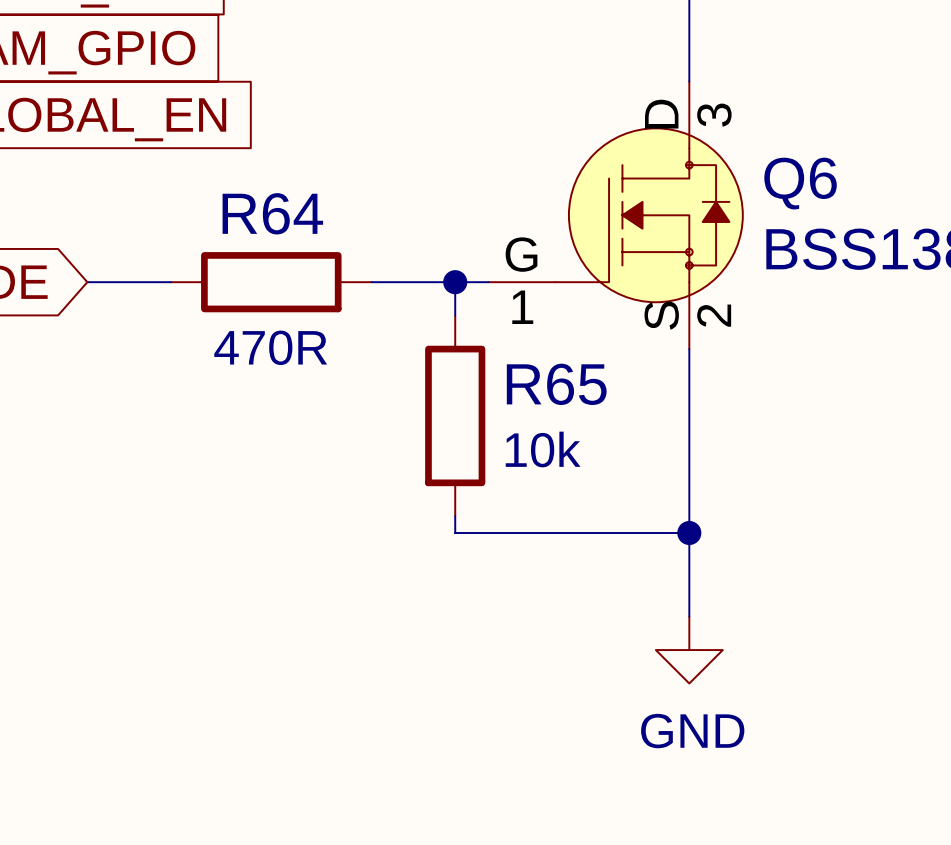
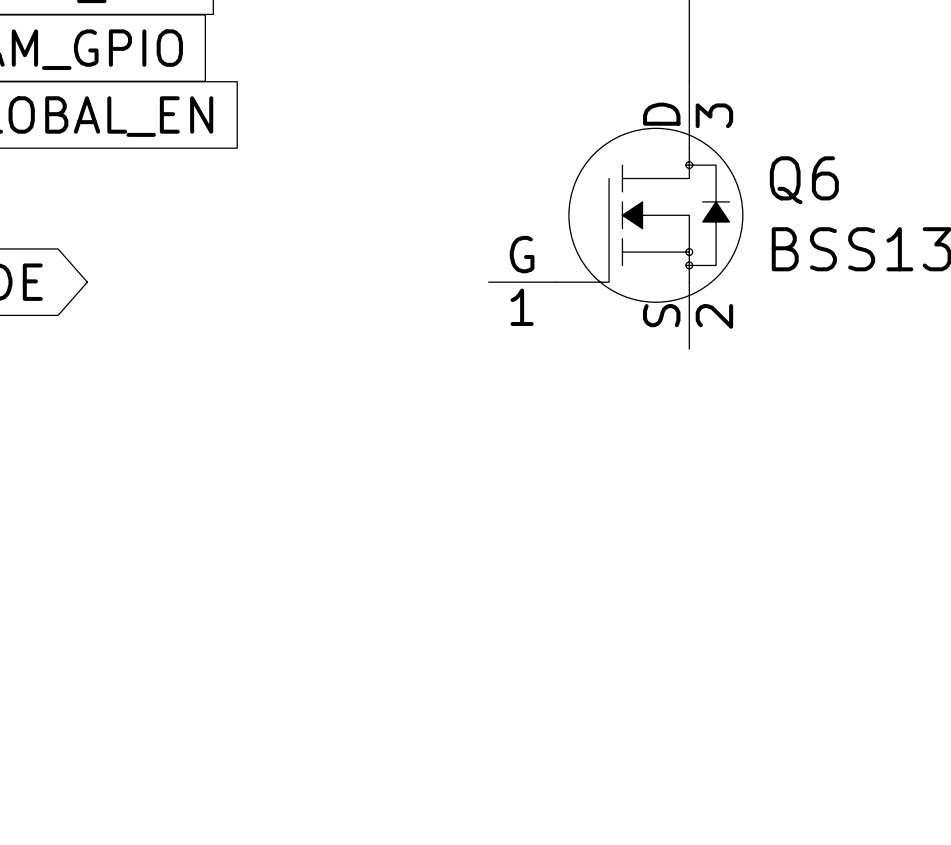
wire: (87, 282) (170, 282) -> none
R64: (271, 282) -> none
wire: (371, 282) (488, 282) -> none
wire: (455, 282) (455, 315) -> none
junction: (455, 282) -> none
wire: (689, 349) (689, 616) -> none
R65: (455, 415) -> none
wire: (455, 516) (455, 533) (689, 533) -> none
junction: (689, 533) -> none
power symbol: GND (689, 650) -> none

